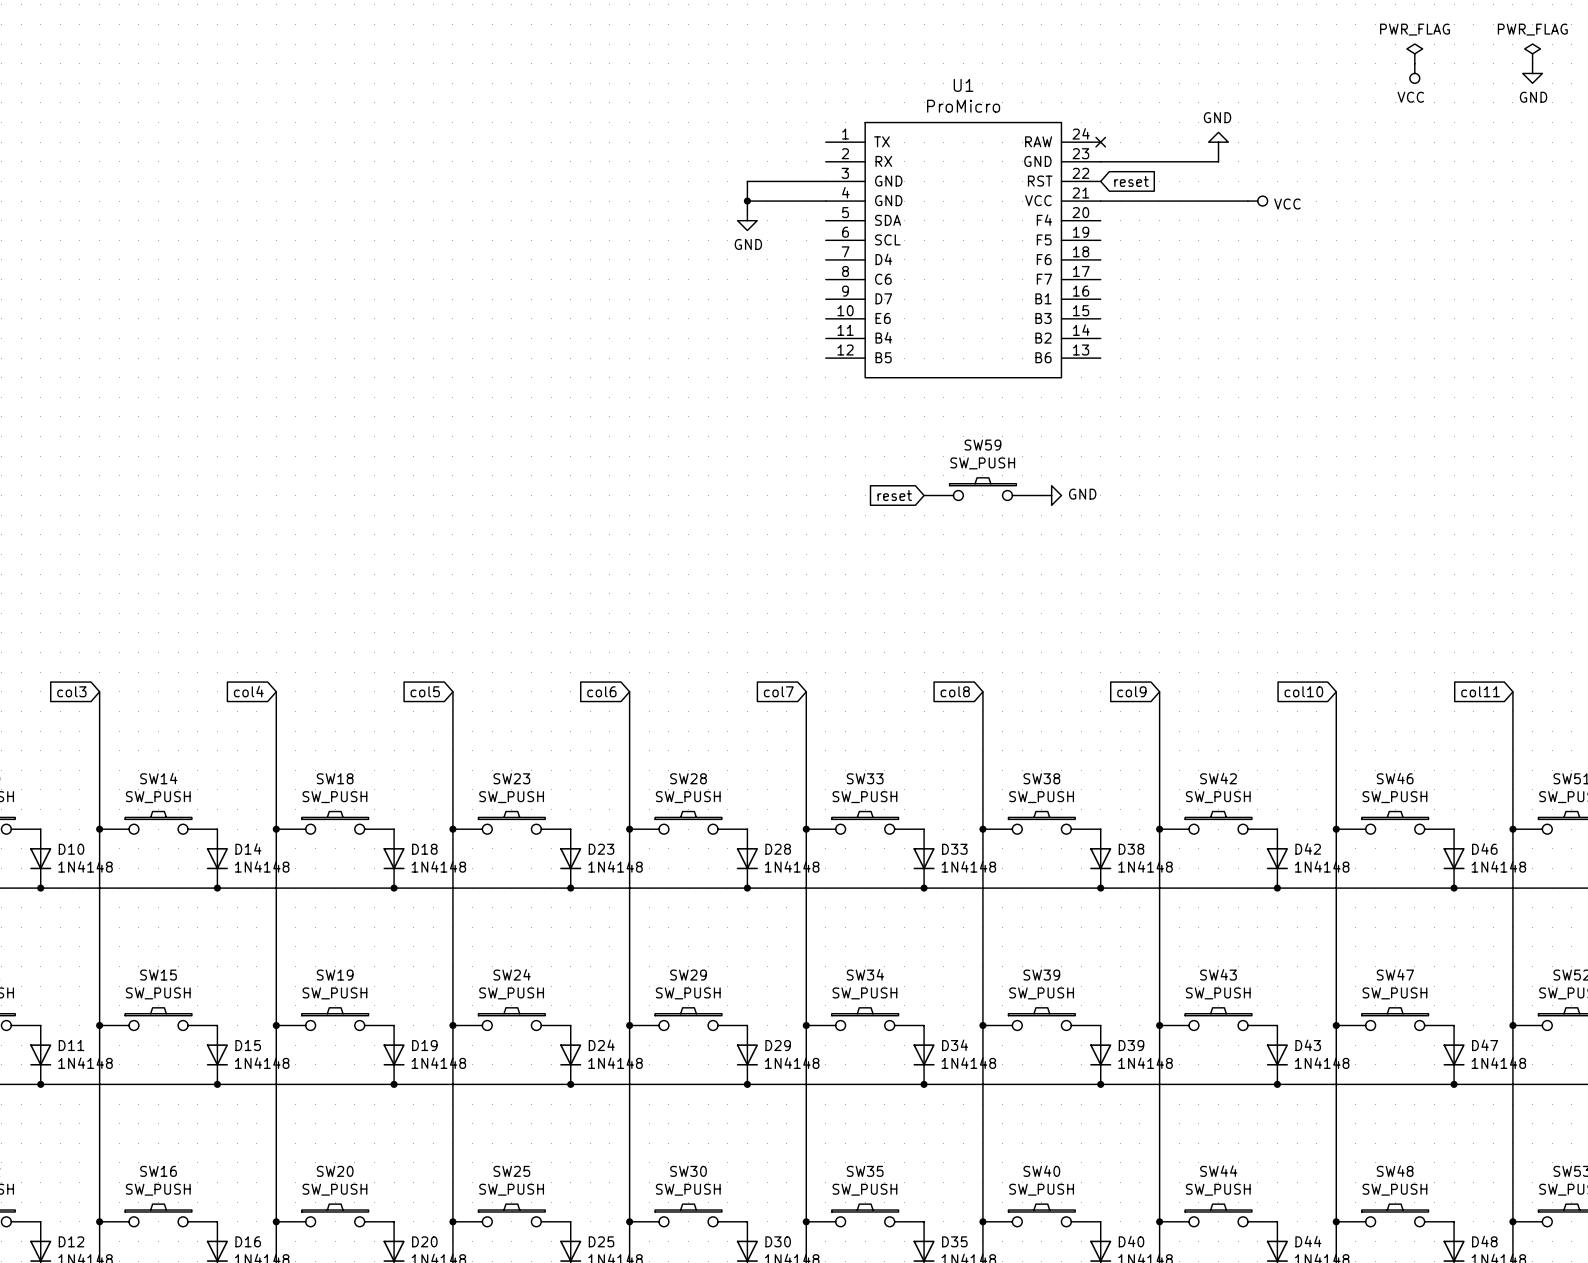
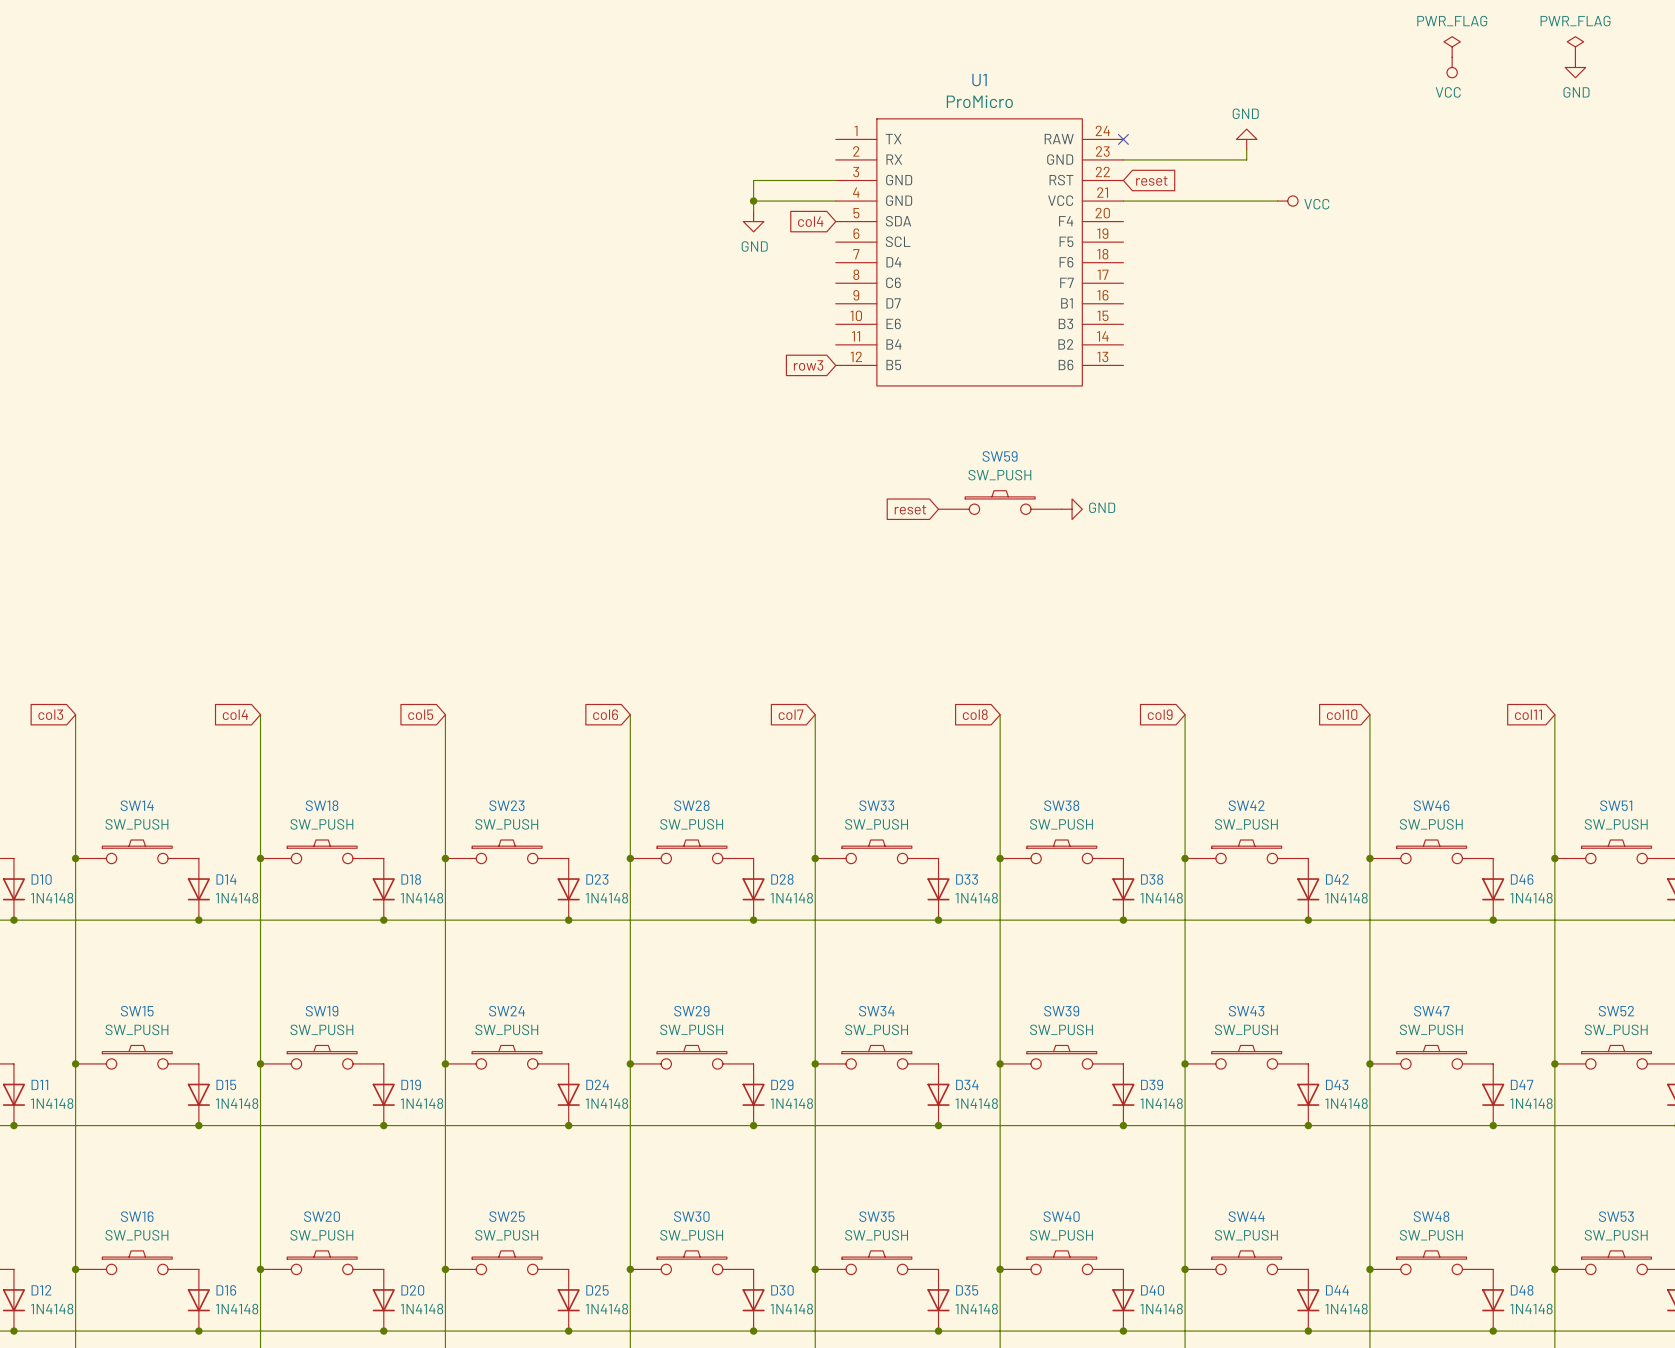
global label: none -> col4 (810, 221)
global label: none -> row3 (808, 365)

